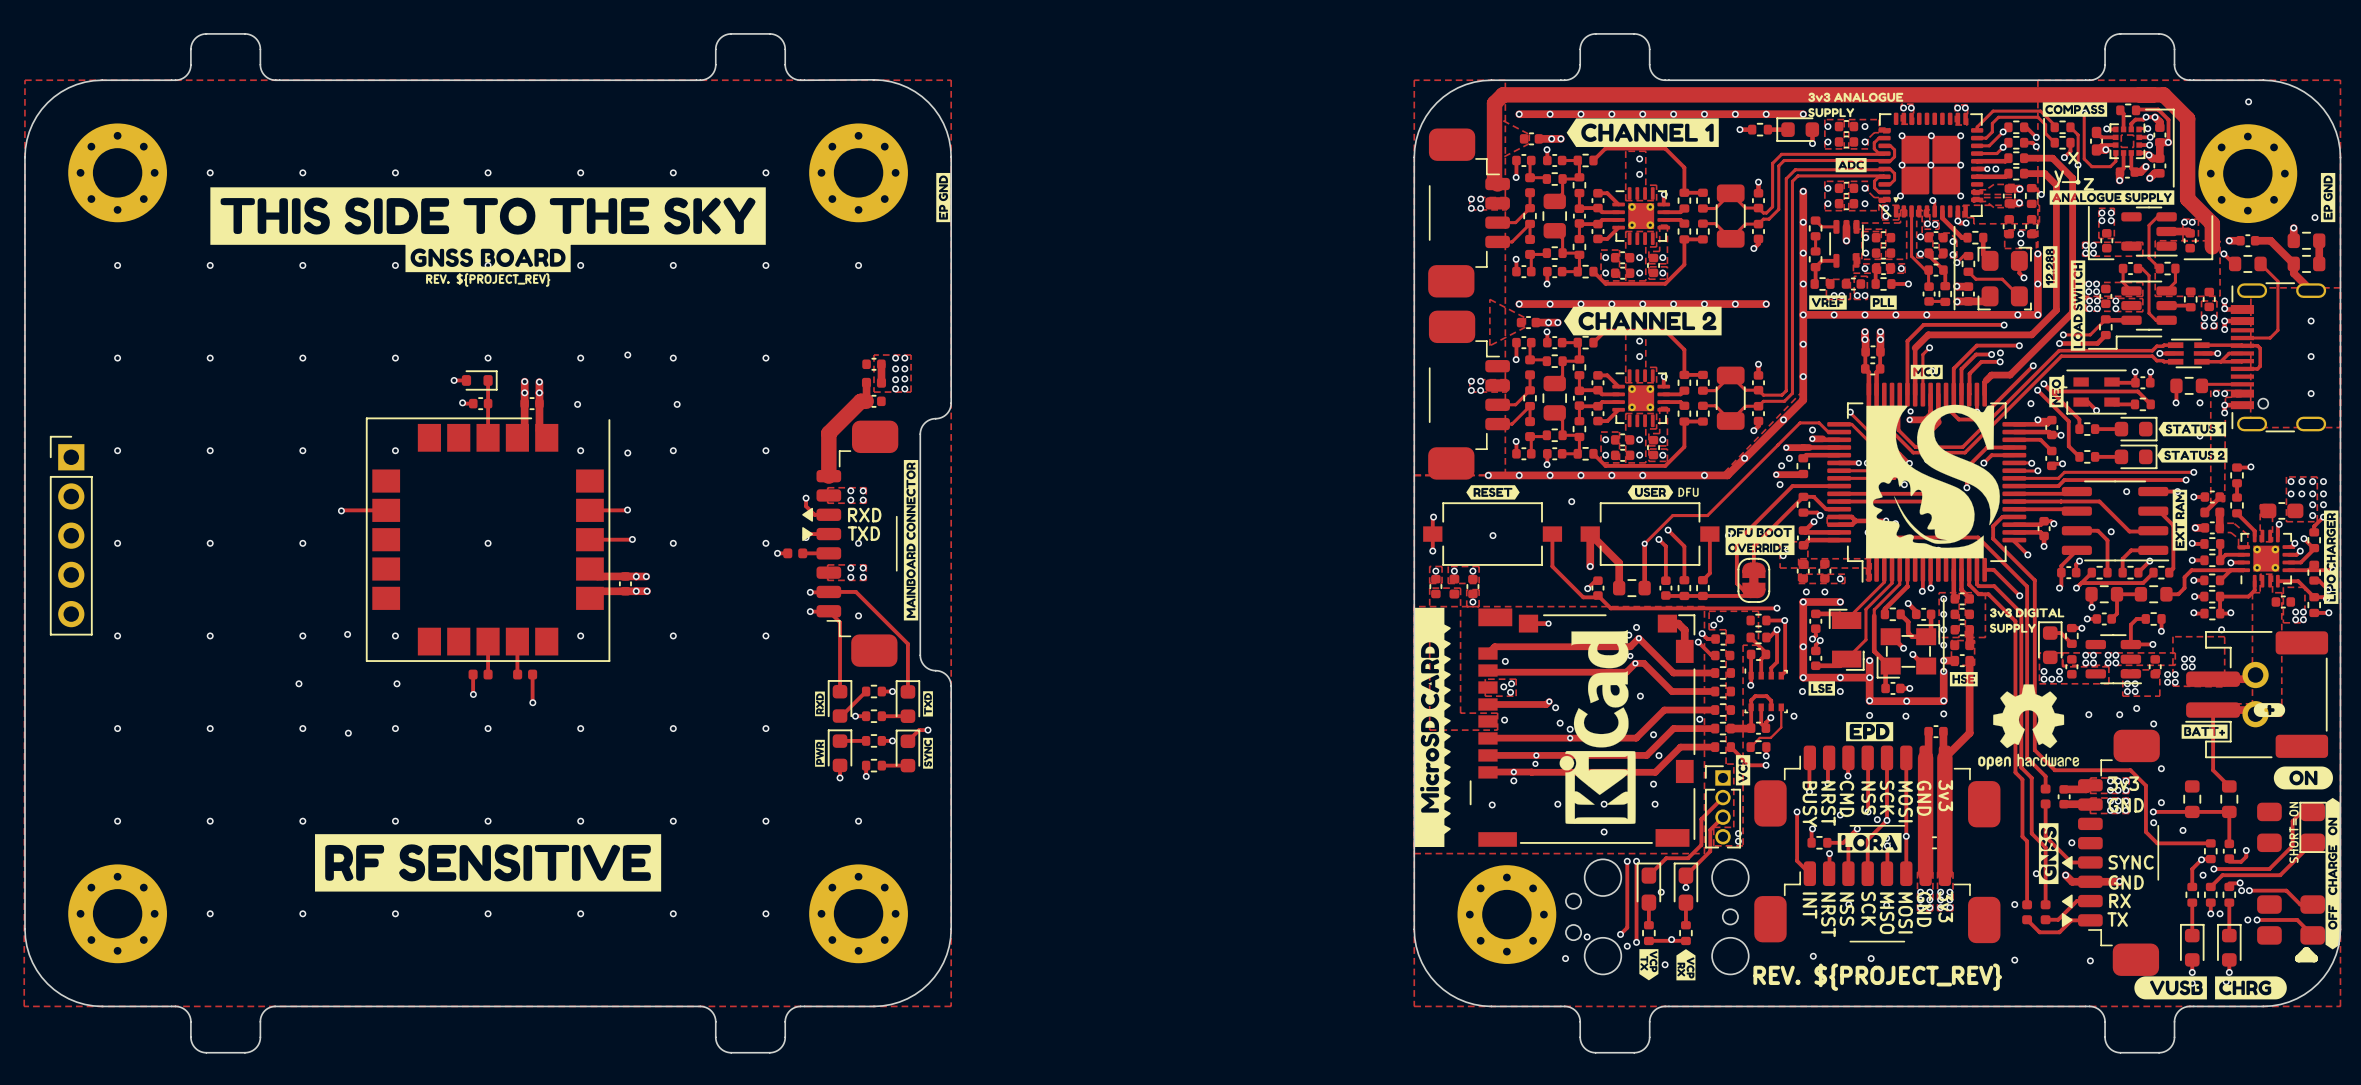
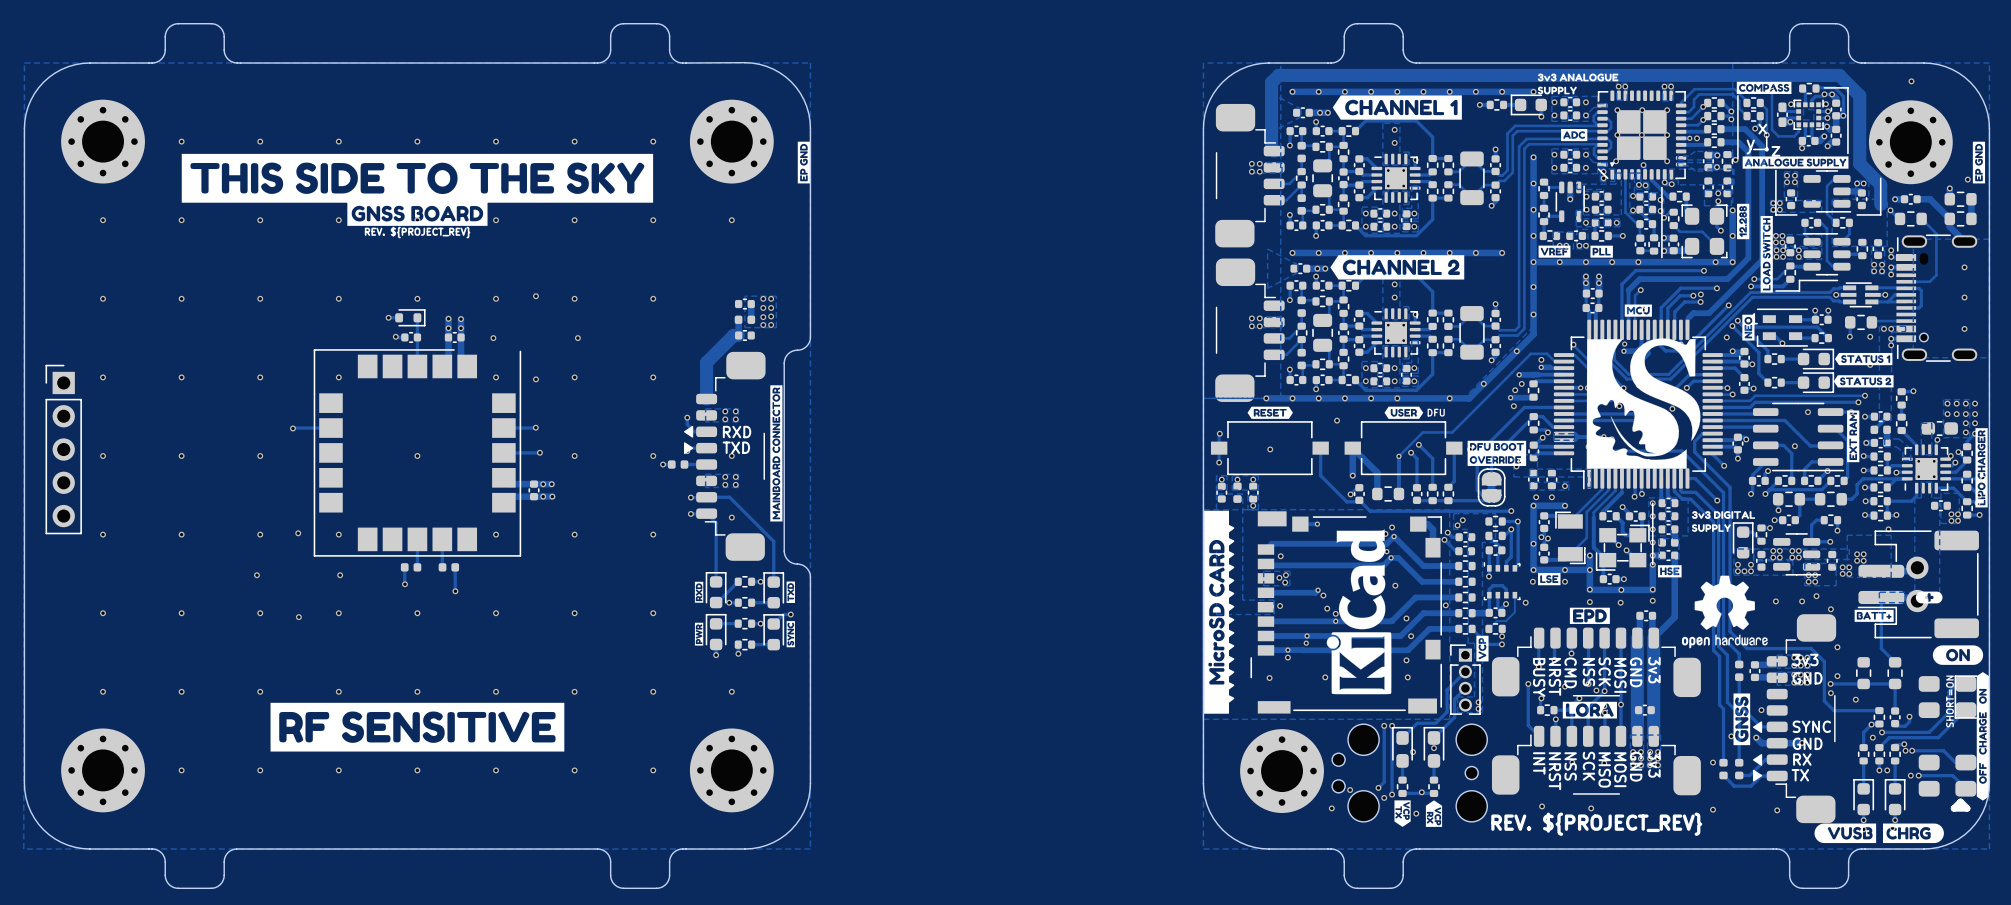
via: (1604, 804) -> none
via: (1604, 831) -> none

